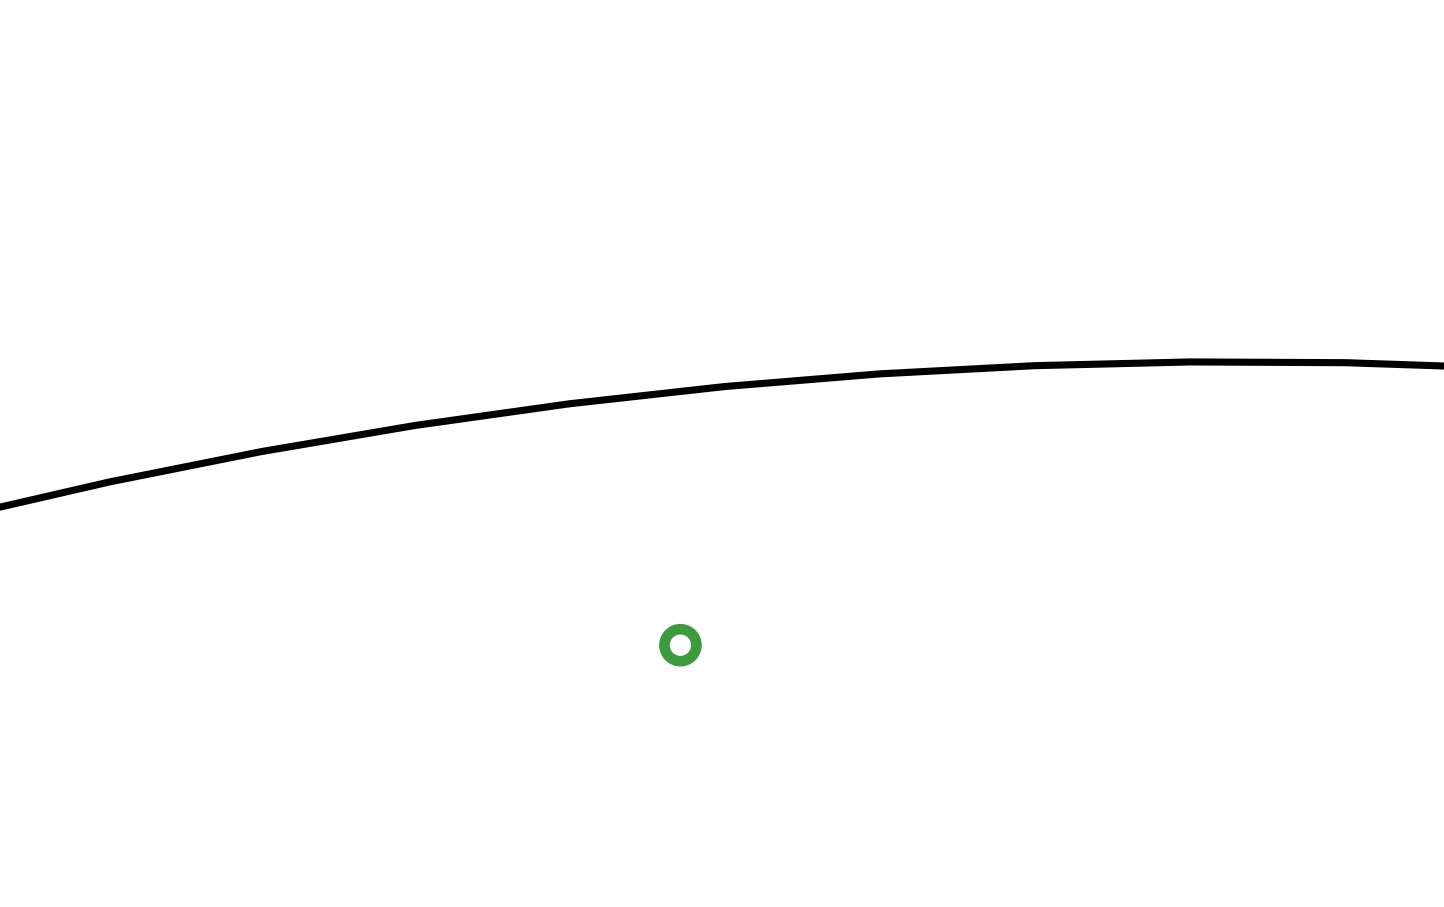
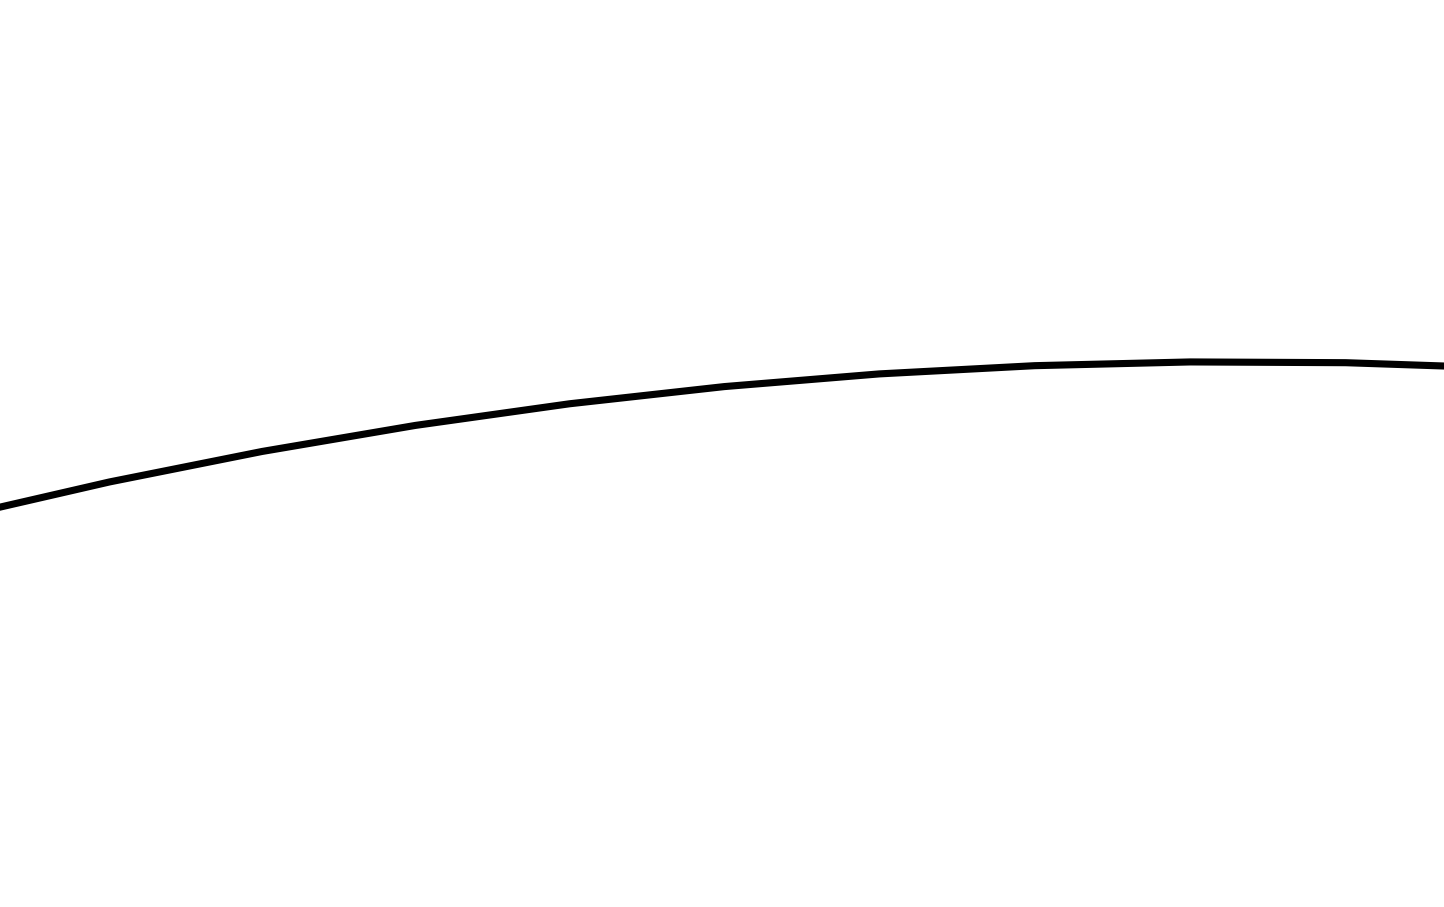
via: (680, 645) -> none

